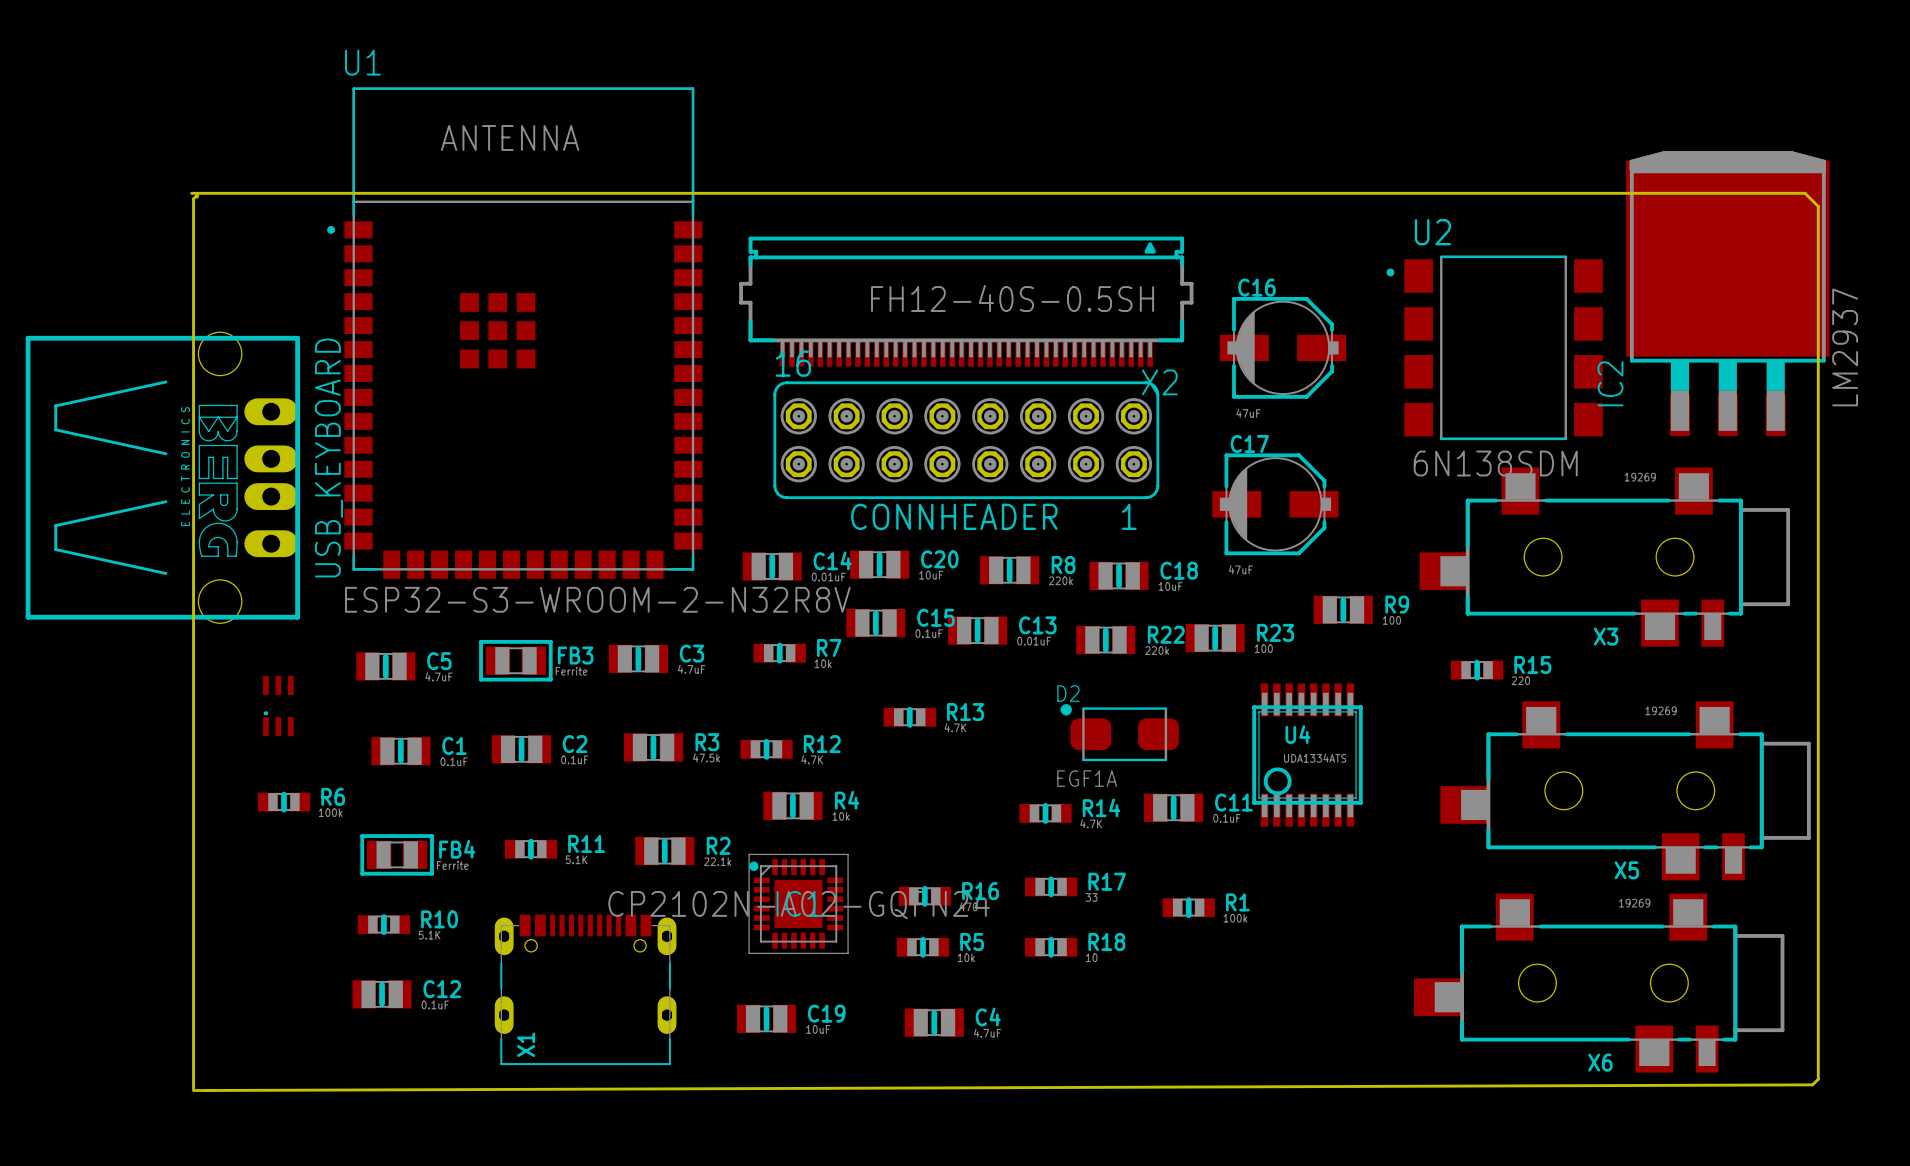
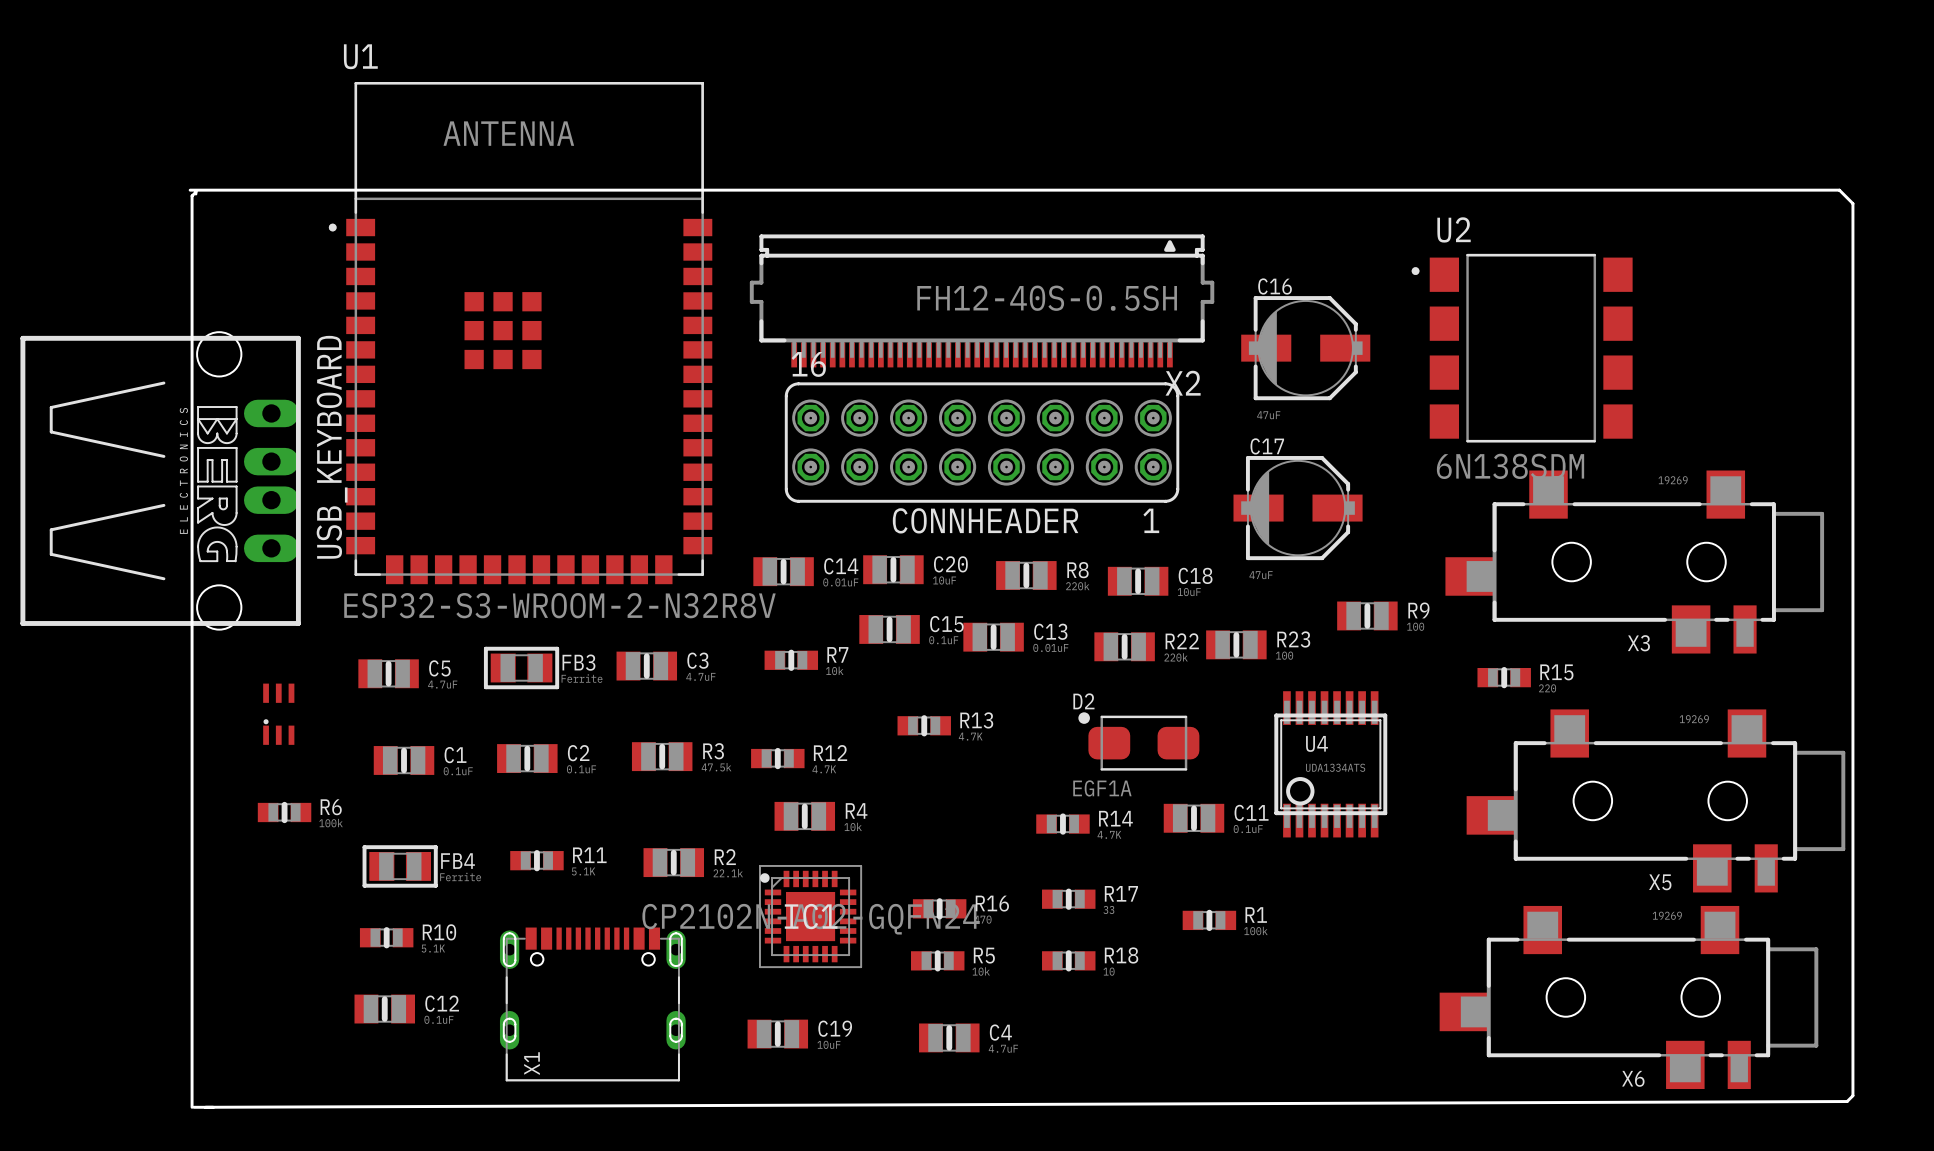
IC2: LM2937 (1727, 293) -> none

